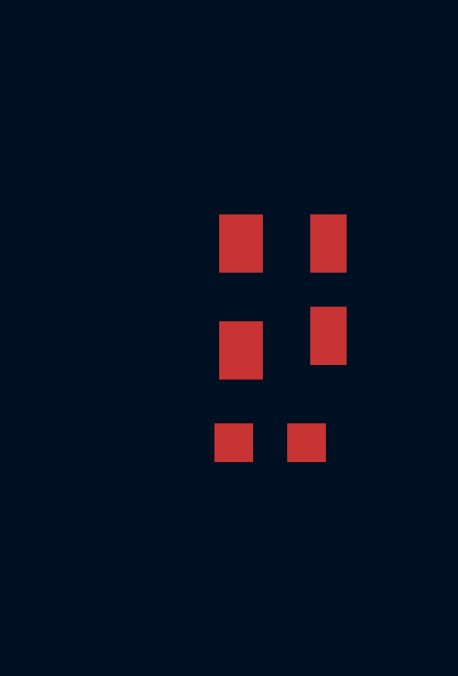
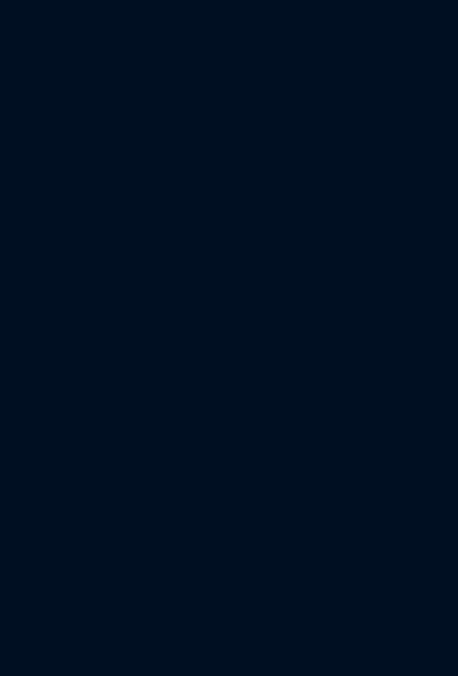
part: (328, 289) -> none
part: (241, 296) -> none
part: (270, 442) -> none

